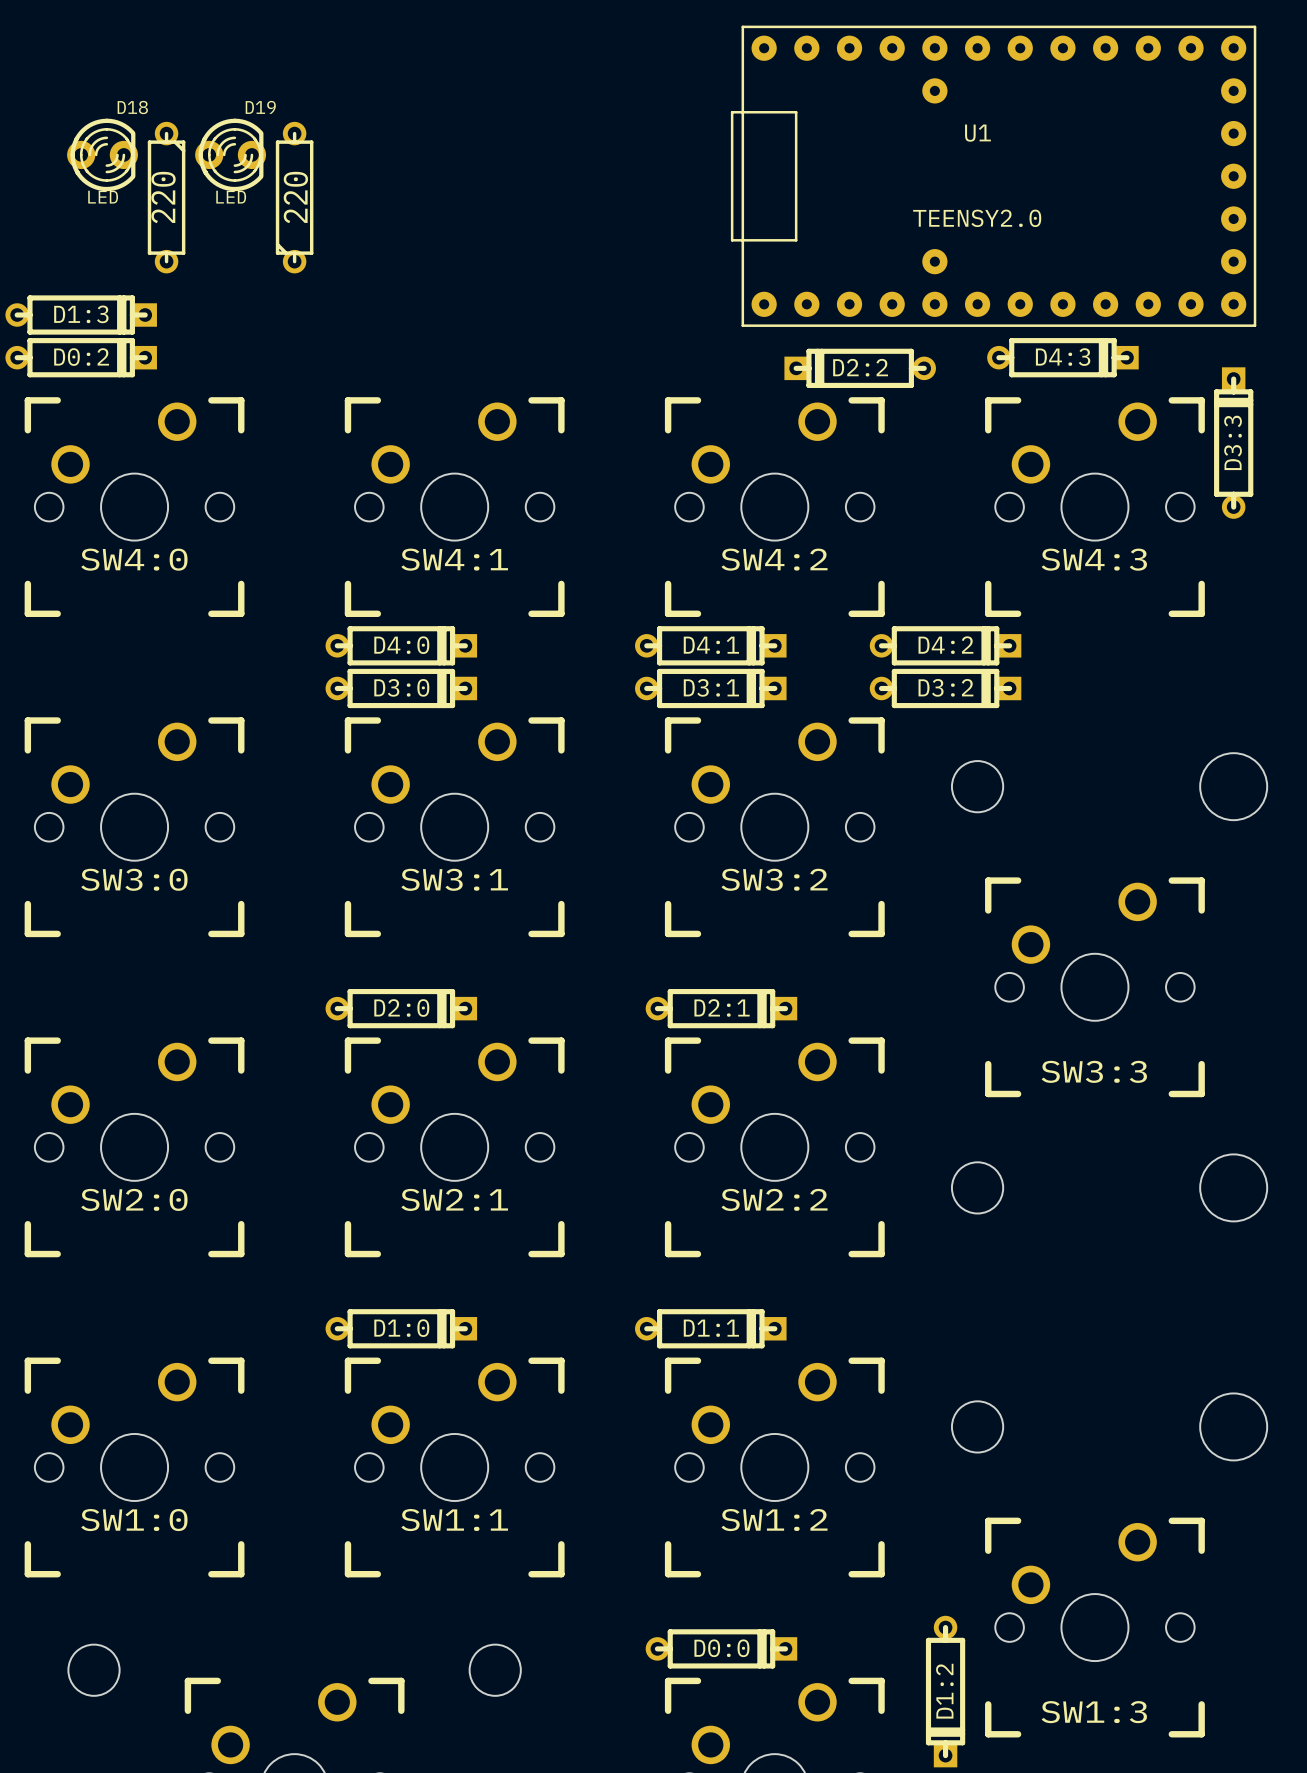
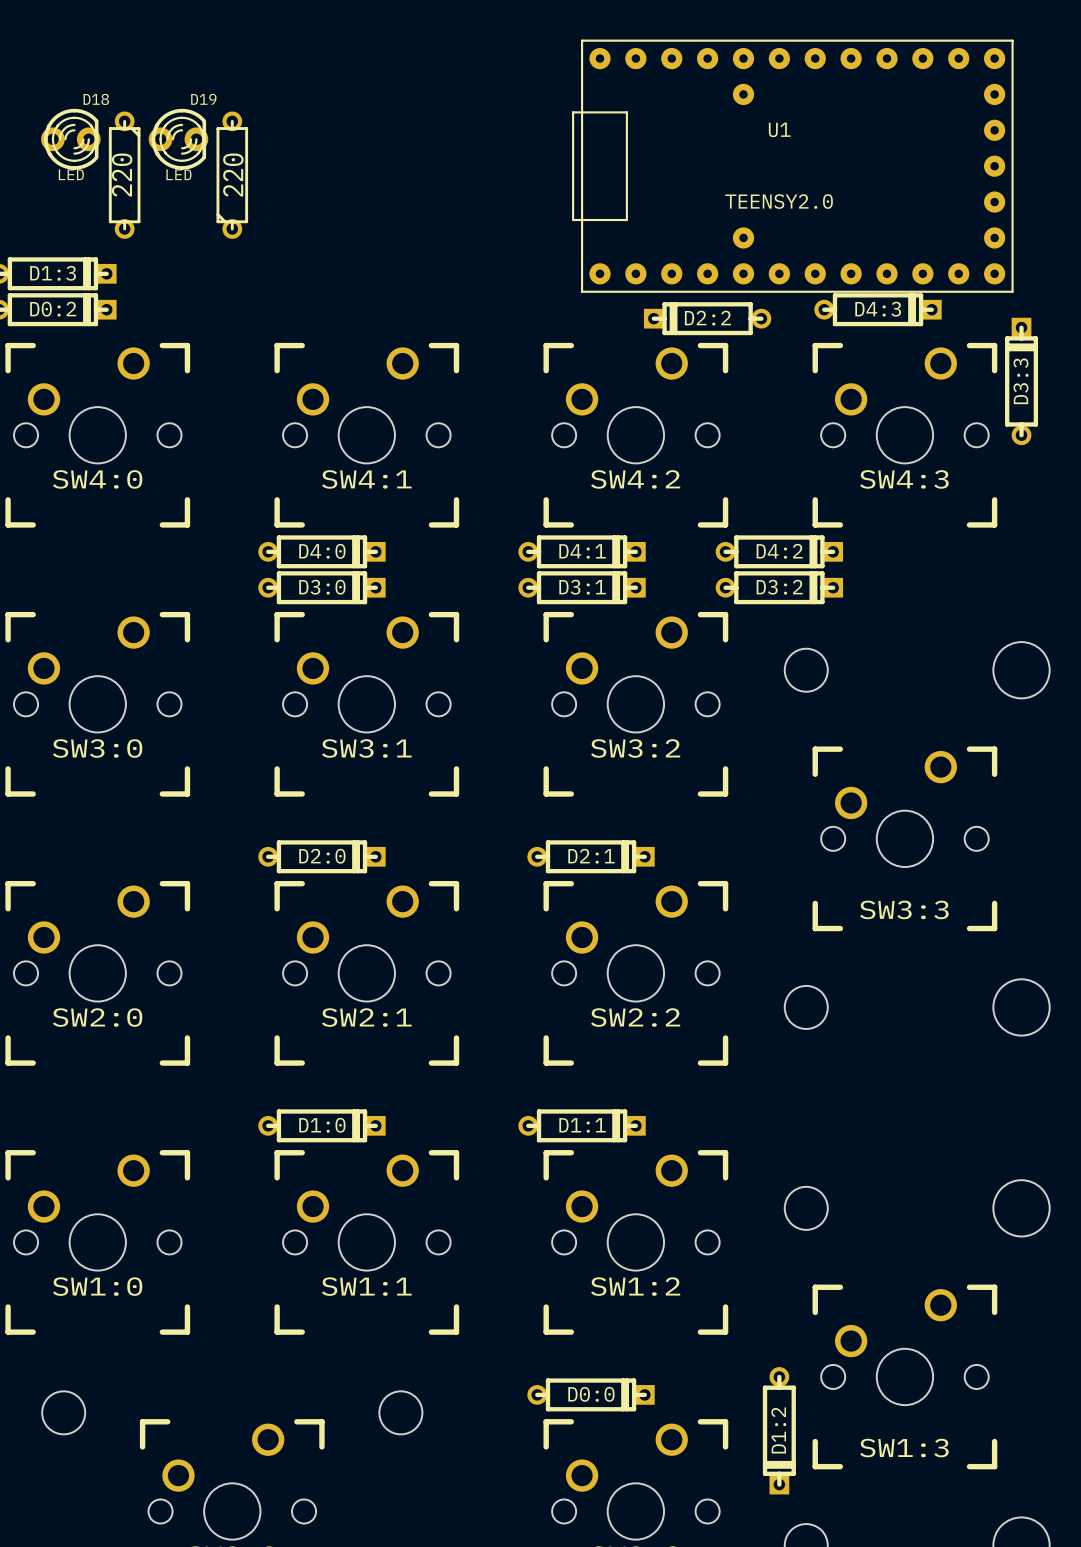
U1 position: (993, 176) -> (792, 166)

